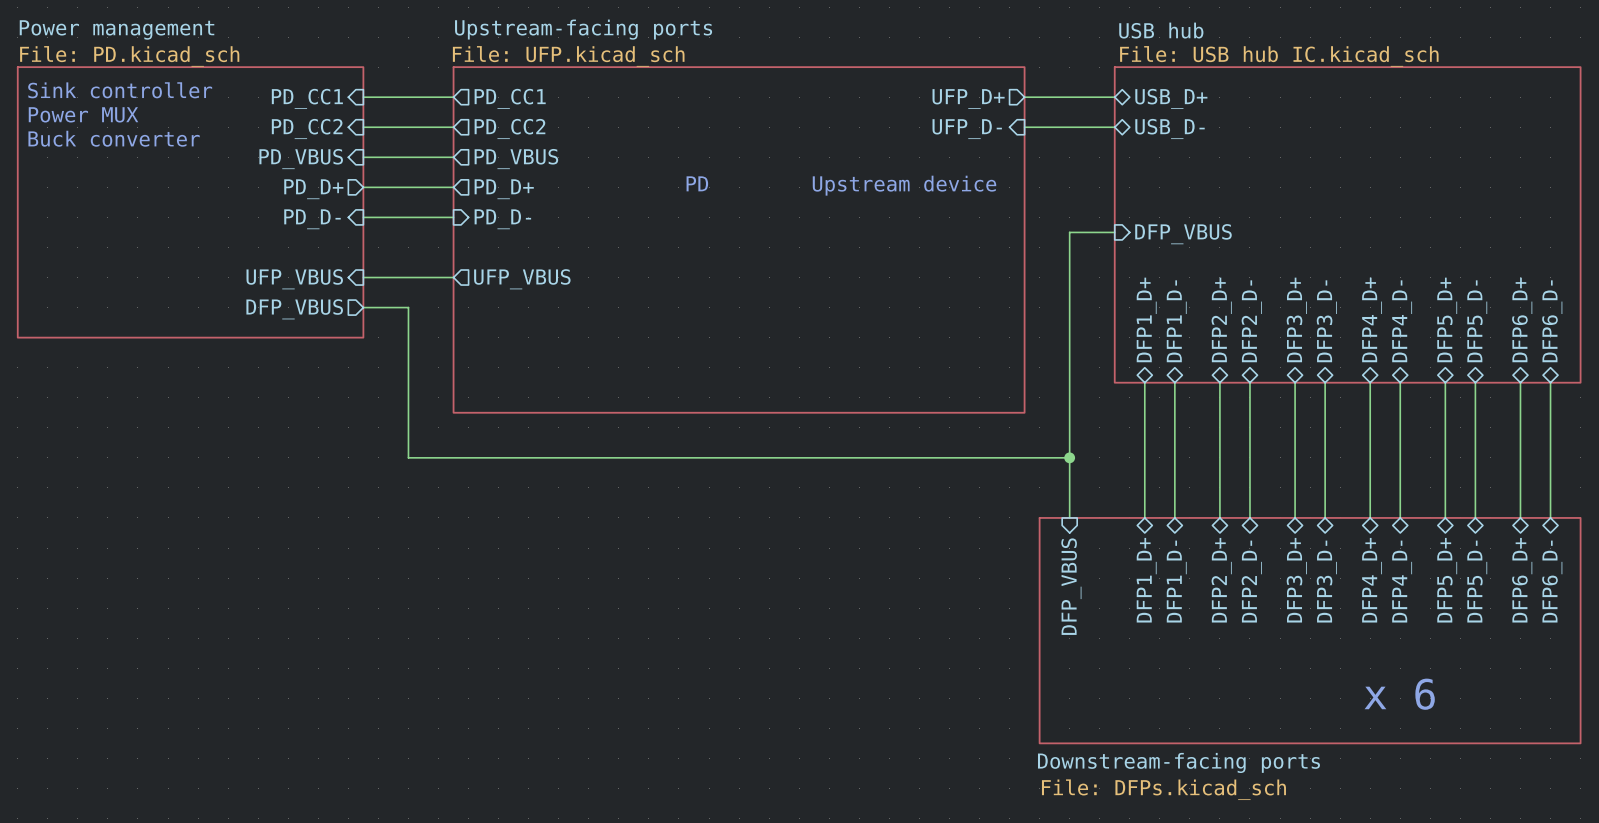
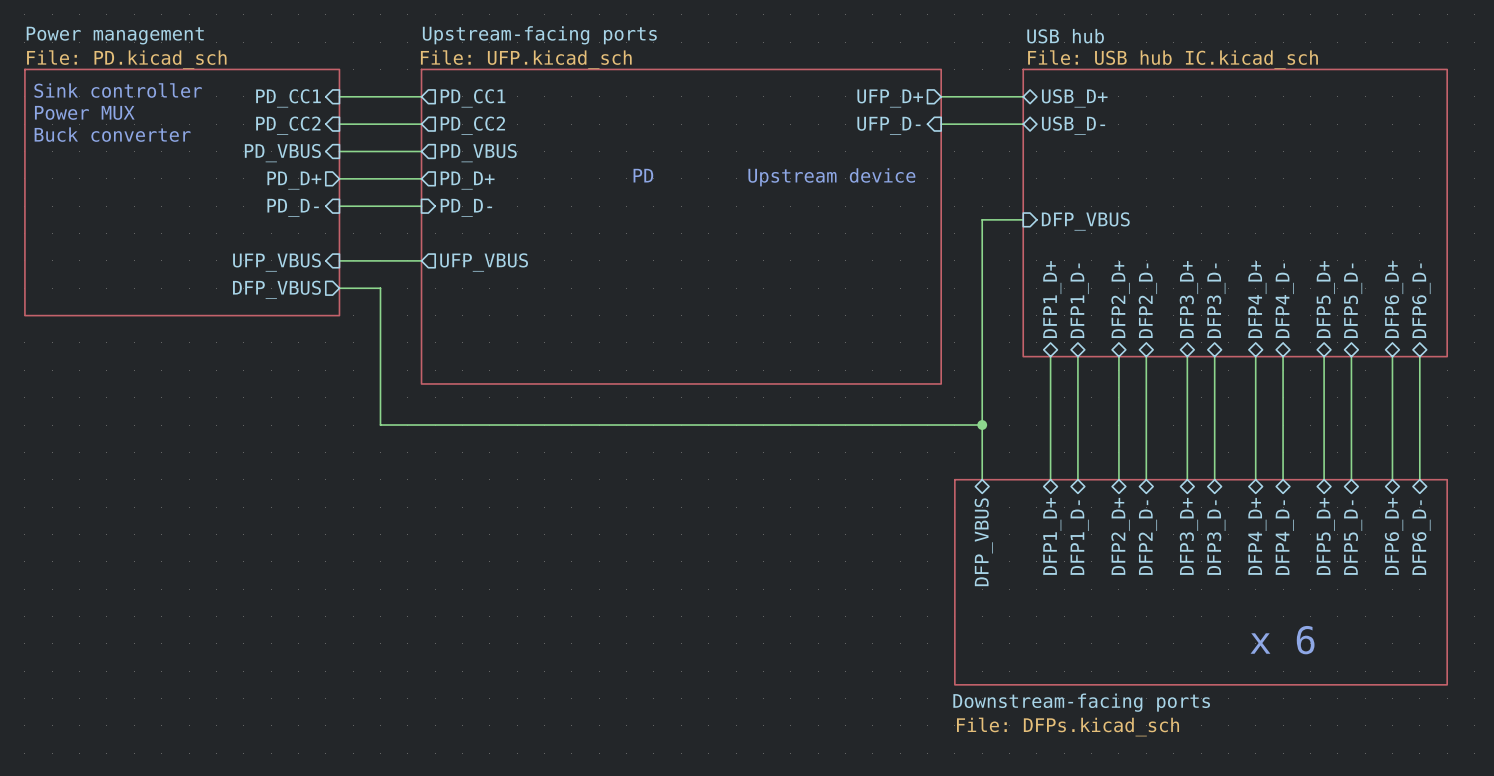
sheet pin shape: input (1071, 586) -> bidirectional (983, 542)

